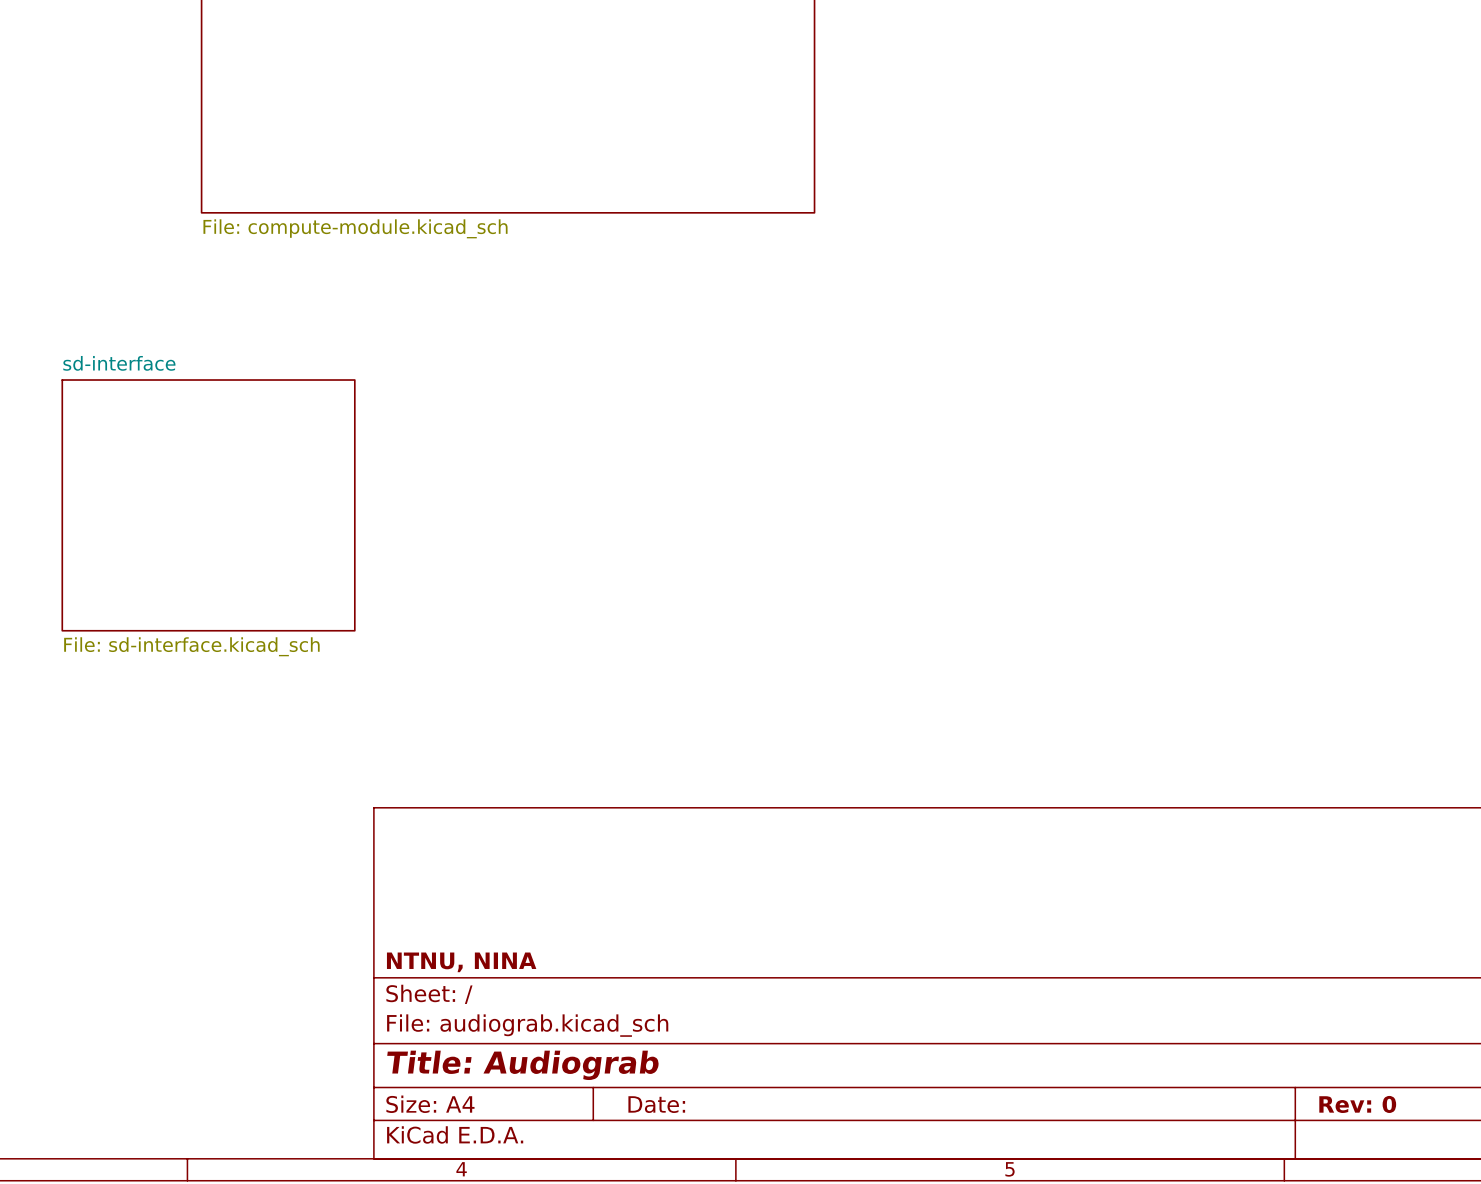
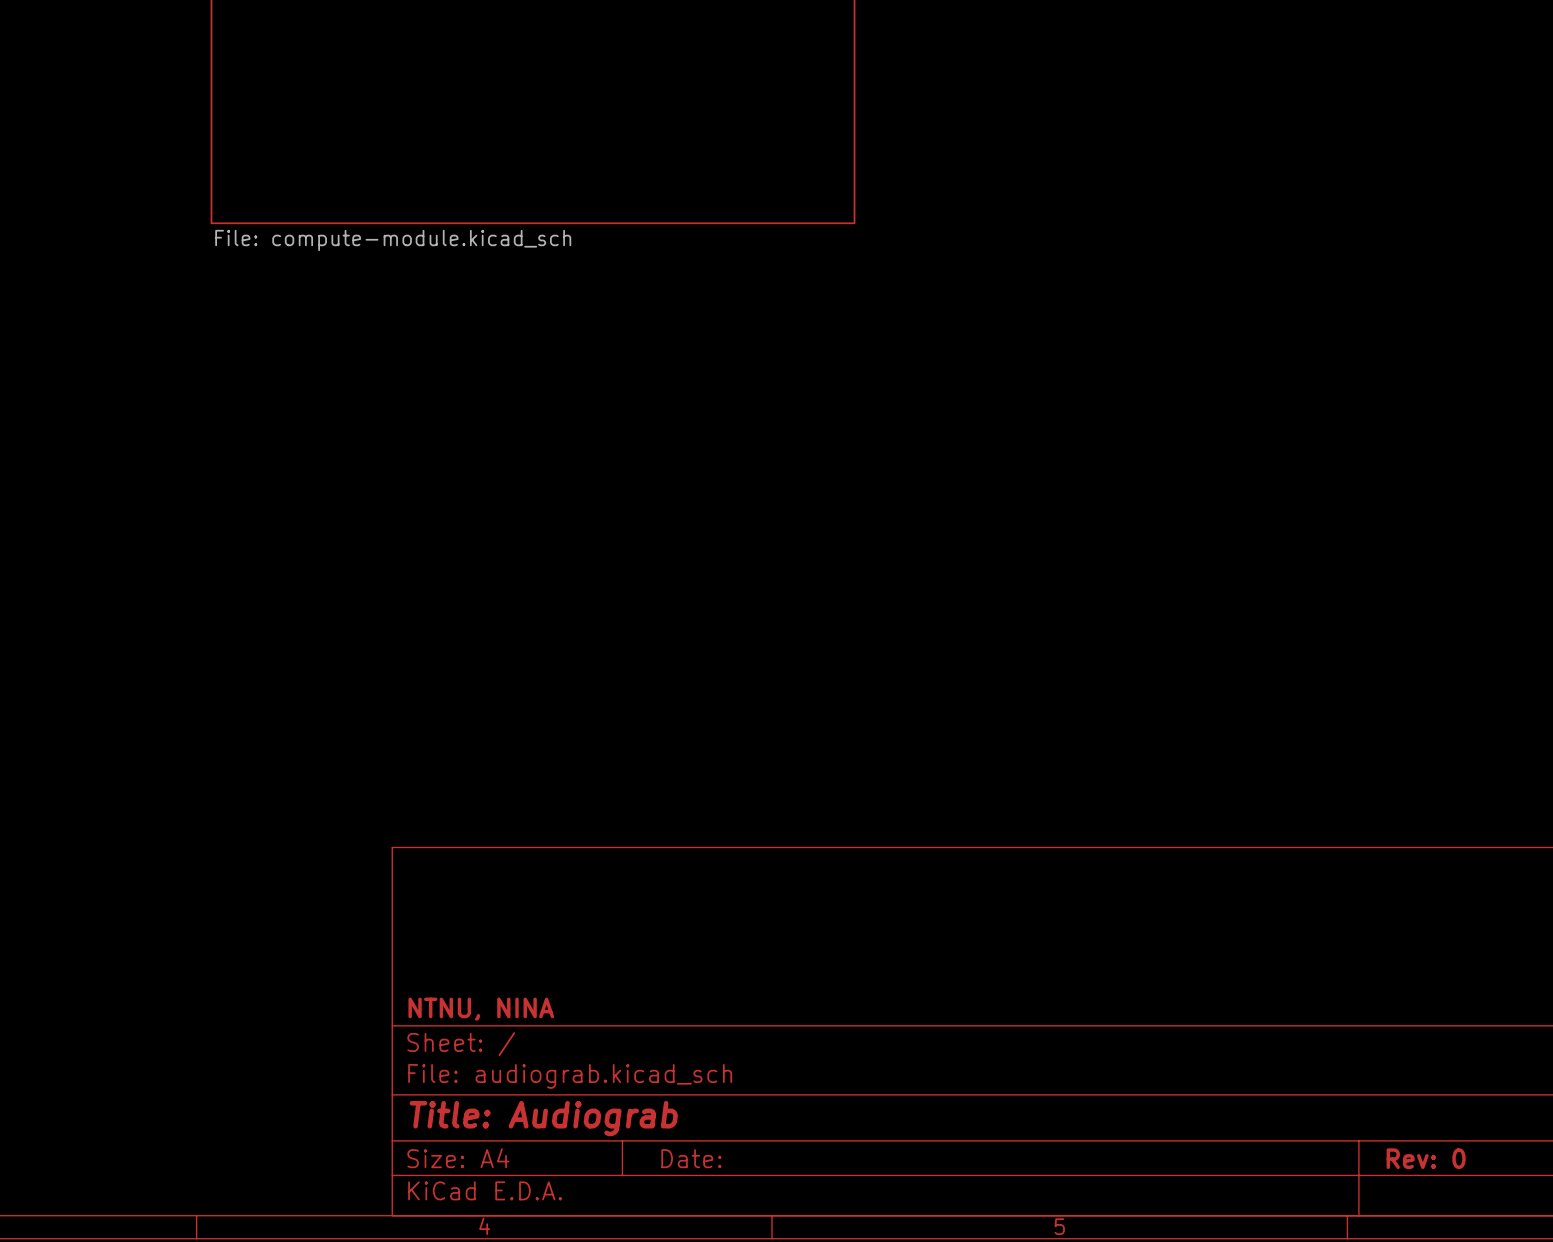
sheet sd-interface: File: sd-interface.kicad_sch (208, 505) -> none

